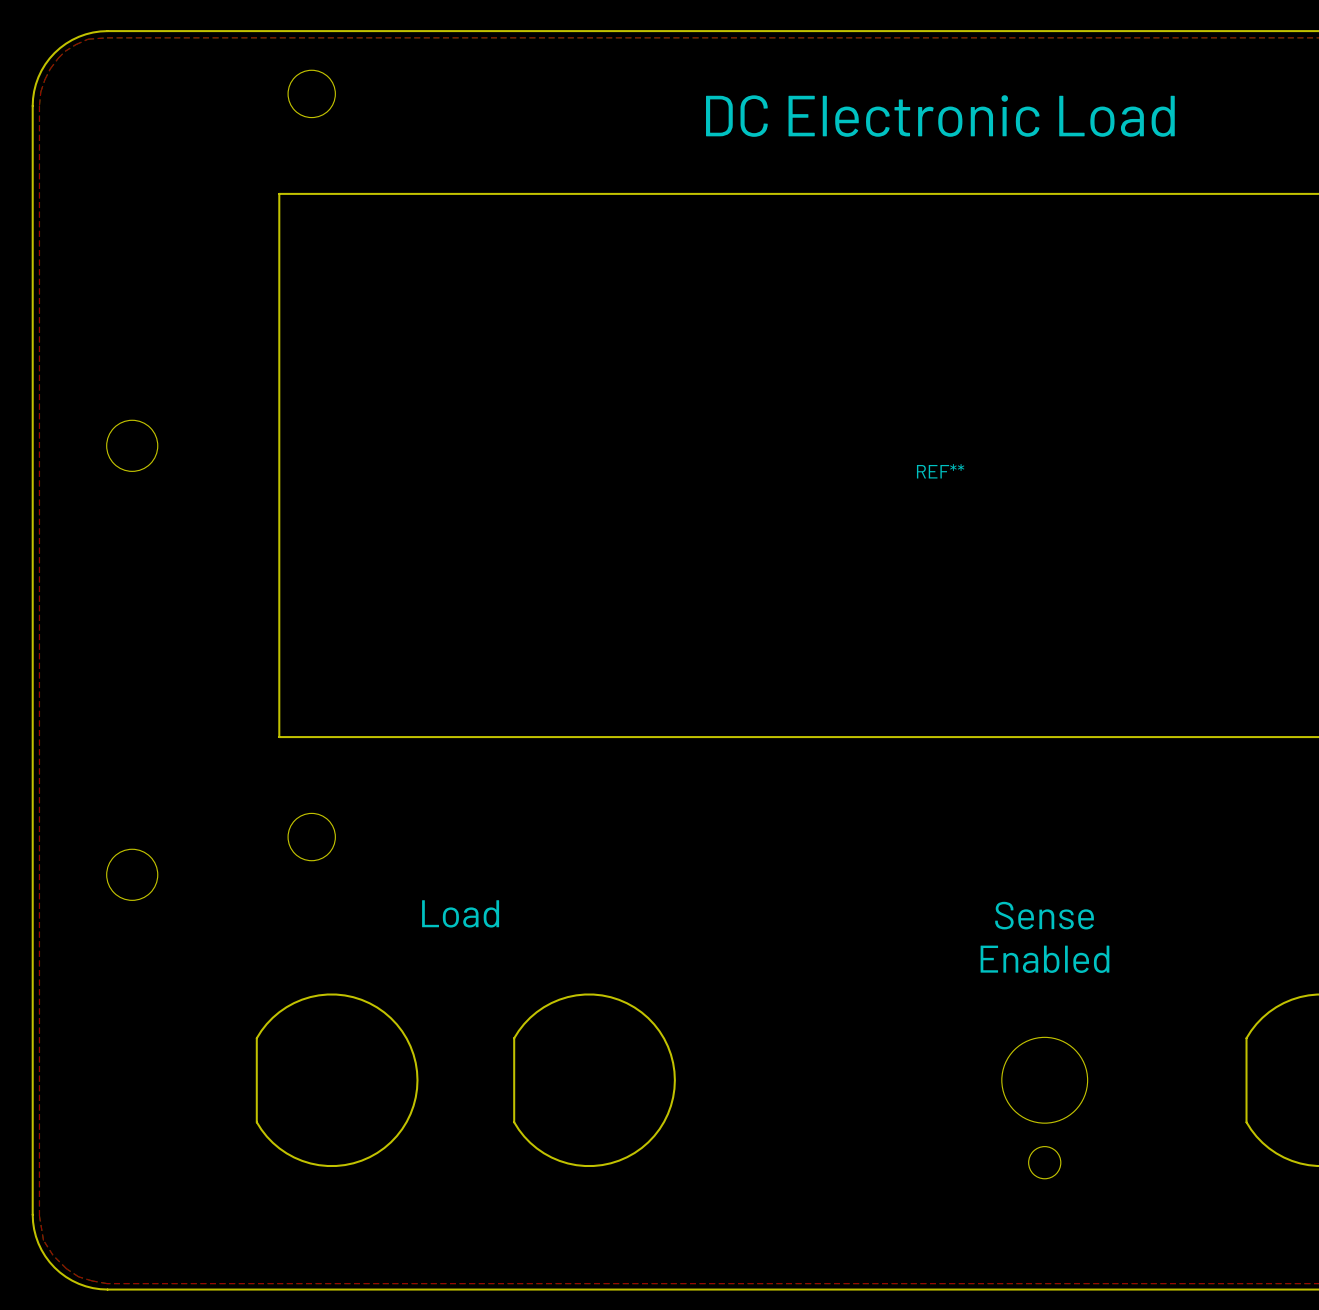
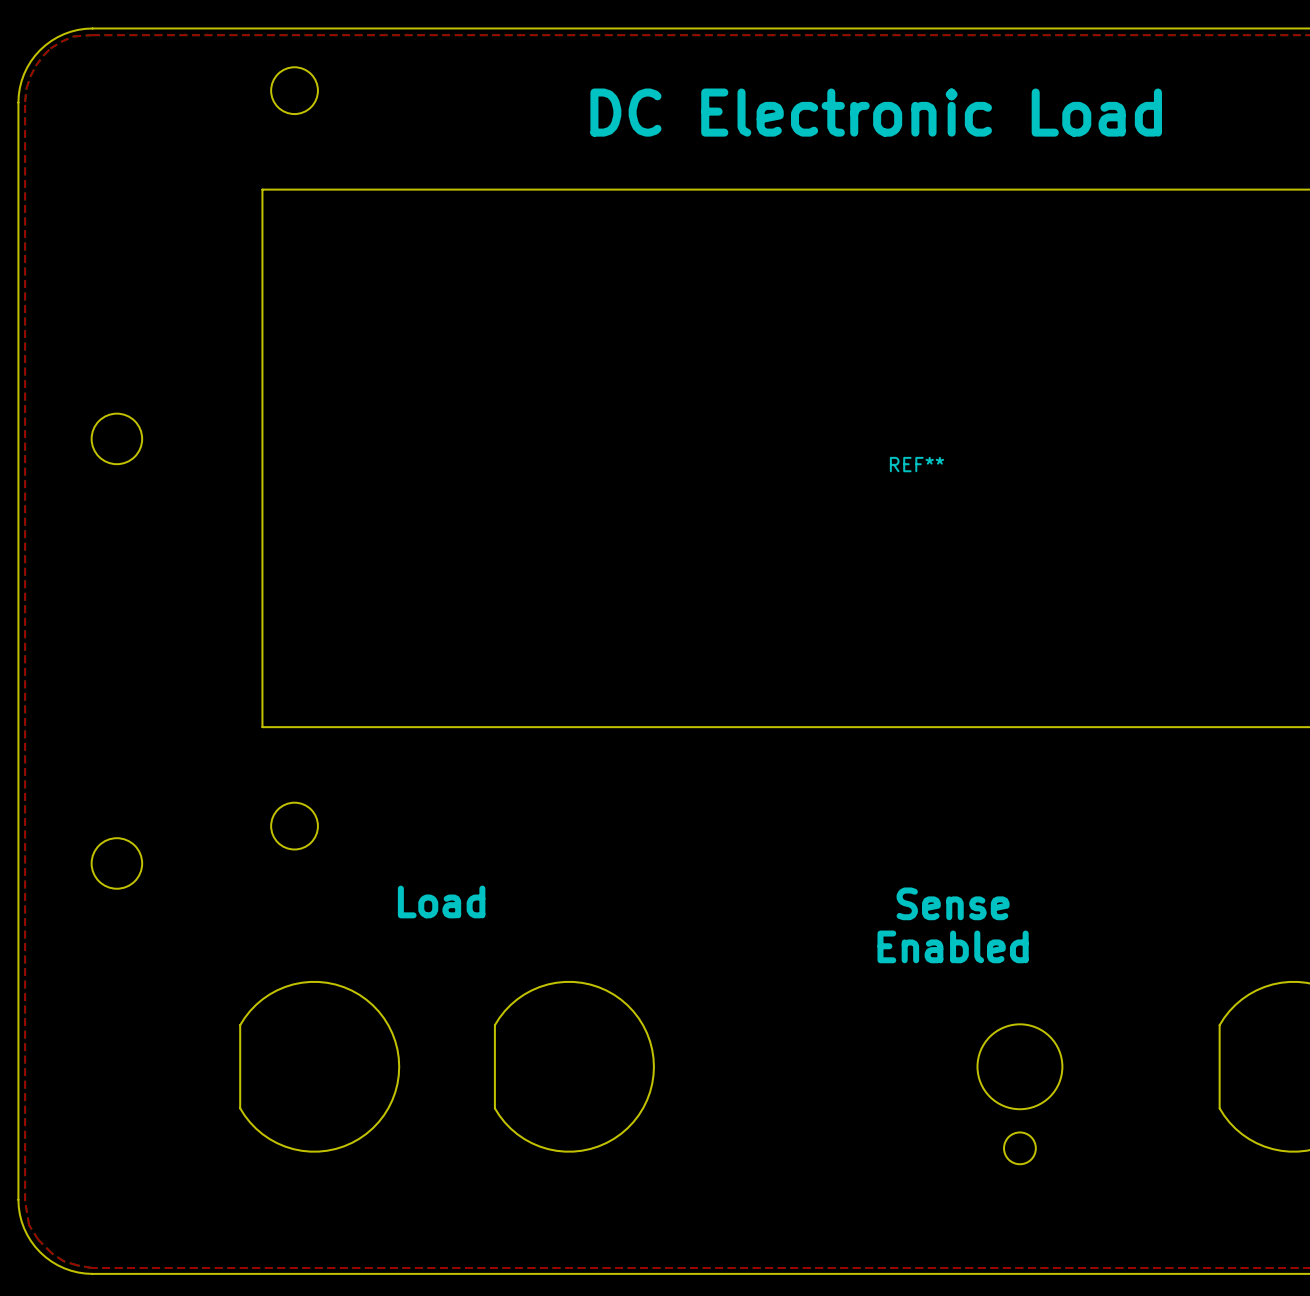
text position: DC Electronic Load (940, 116) -> DC Electronic Load (876, 112)
text position: Sense (1044, 915) -> Sense (953, 903)
text position: Enabled (1044, 959) -> Enabled (953, 946)

